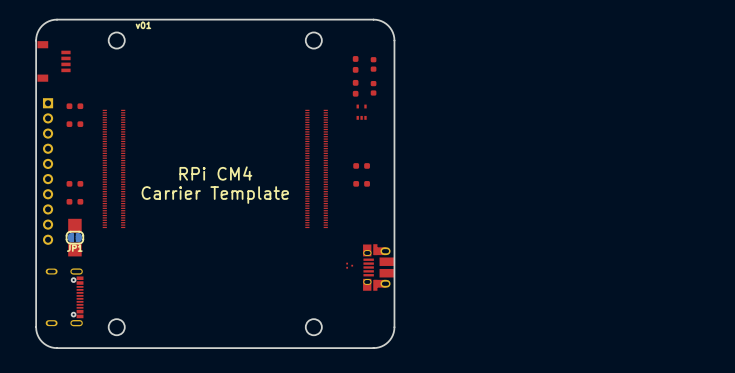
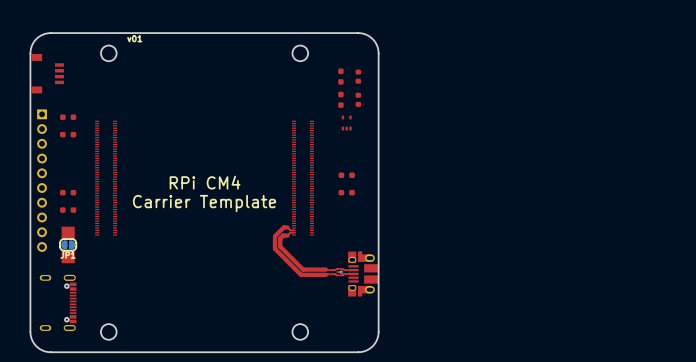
top track: none -> (294, 230) (283, 227) (275, 236) (275, 248) (300, 274) (353, 273)
top track: none -> (294, 232) (283, 235) (280, 238) (280, 246) (303, 269) (353, 270)
top track: none -> (341, 272) (337, 272)
via: none -> (341, 272)

